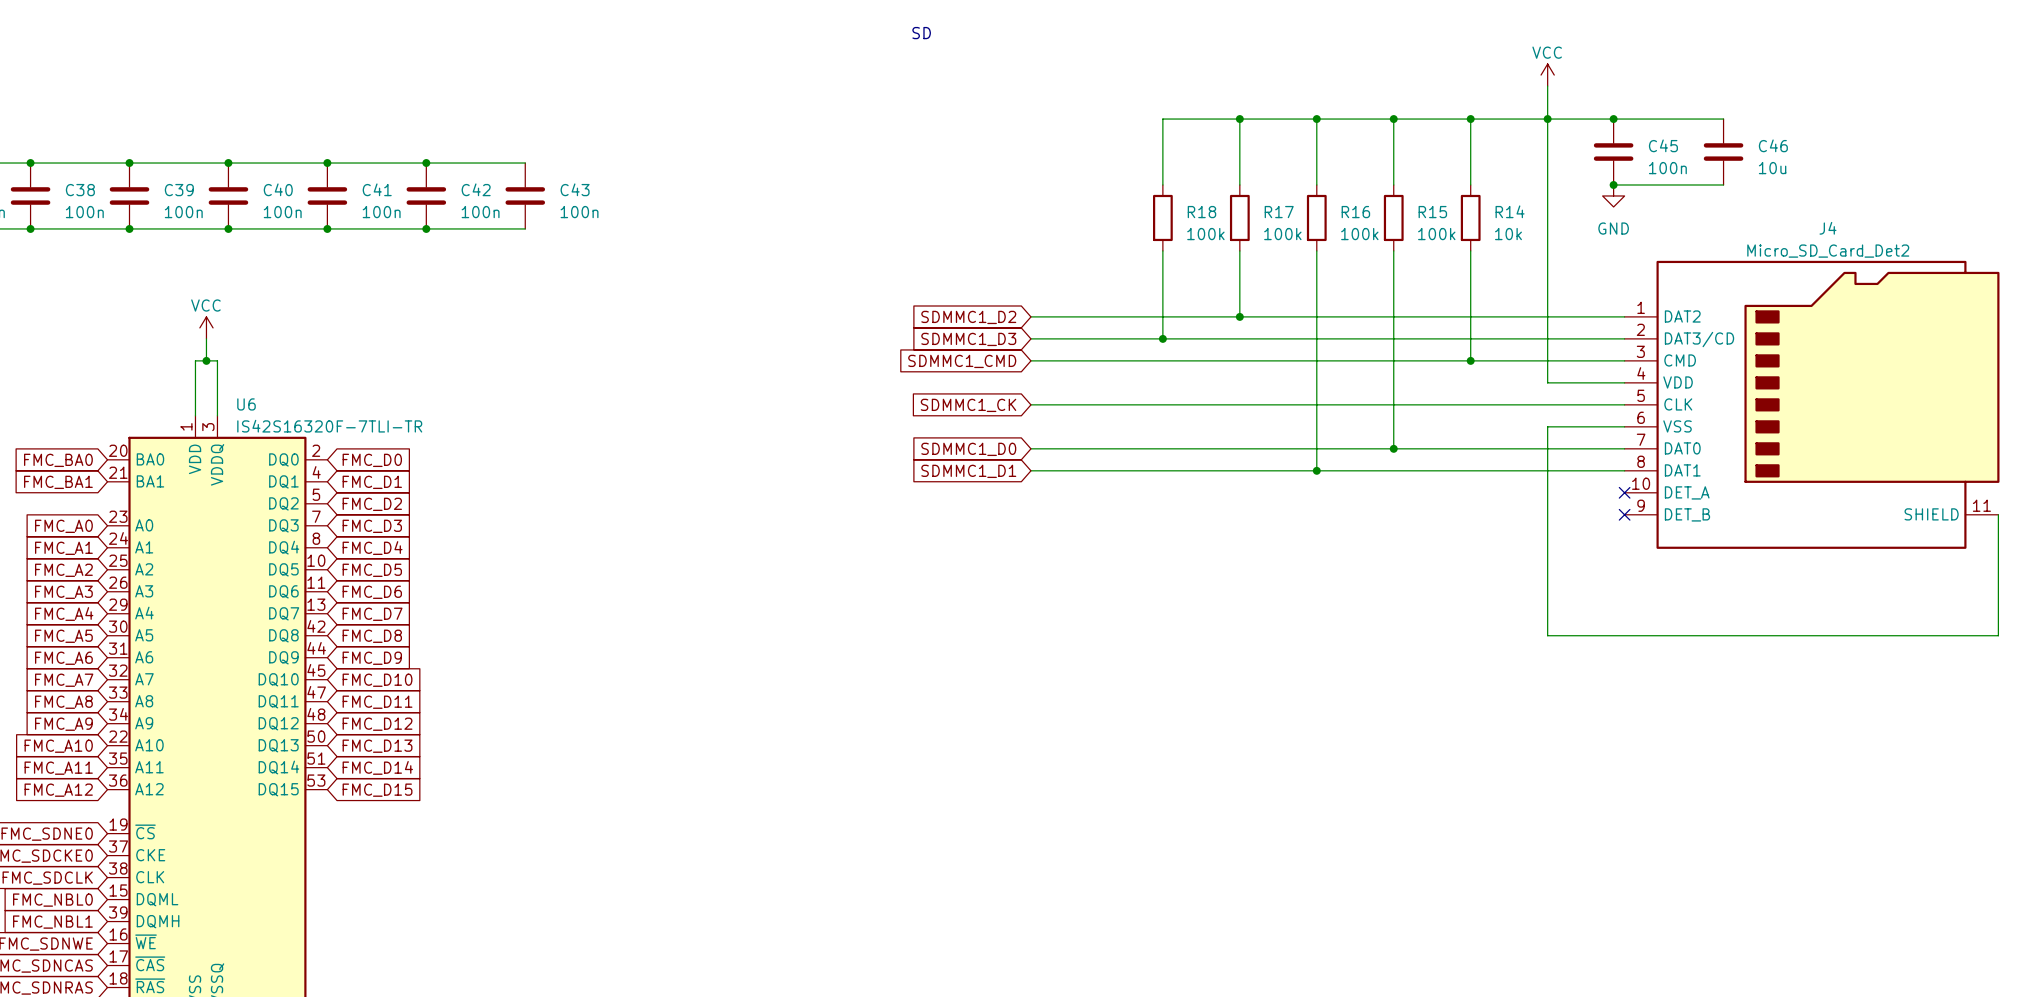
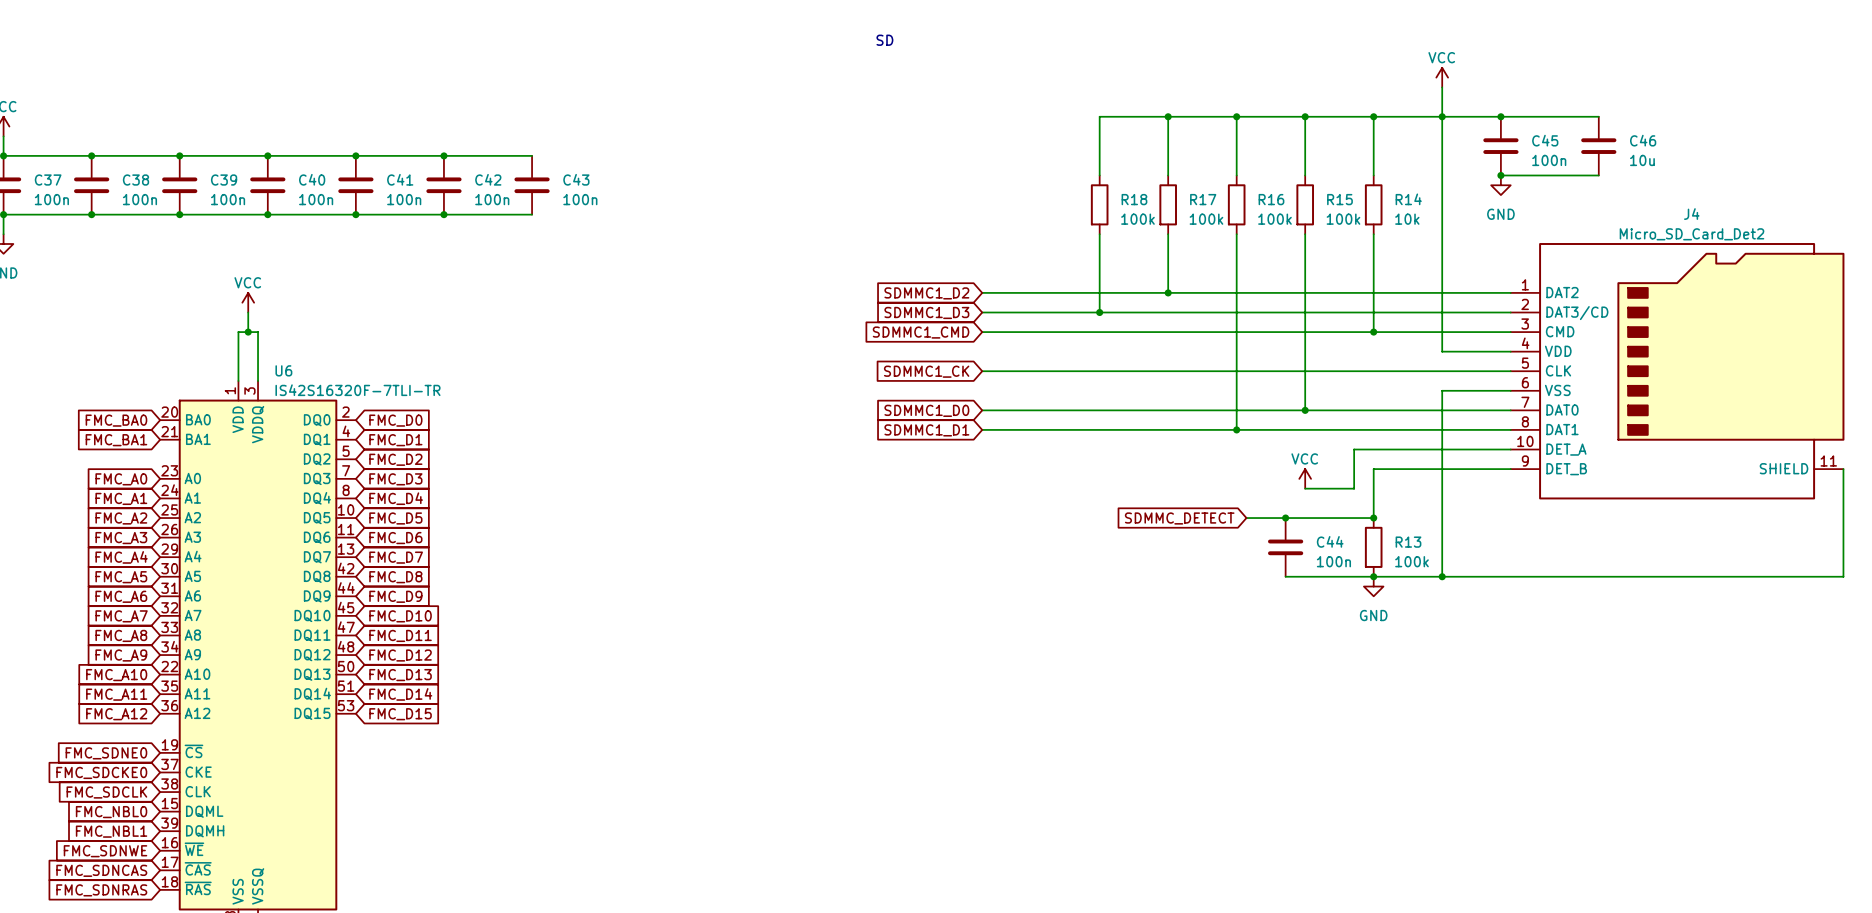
wire: none -> (1510, 449) (1354, 449) (1354, 488) (1305, 488)
no-connect mark: (1624, 492) -> none
wire: none -> (1510, 469) (1373, 469) (1373, 518) (1246, 518)
no-connect mark: (1624, 514) -> none
power symbol: none -> VCC (1305, 478)
junction: none -> (1285, 518)
junction: none -> (1373, 518)
global label: none -> SDMMC_DETECT (1179, 518)
C44: none -> 100n (1285, 547)
R13: none -> 100k (1373, 547)
wire: none -> (1285, 576) (1442, 576)
junction: none -> (1373, 576)
junction: none -> (1442, 576)
power symbol: none -> GND (1373, 586)

